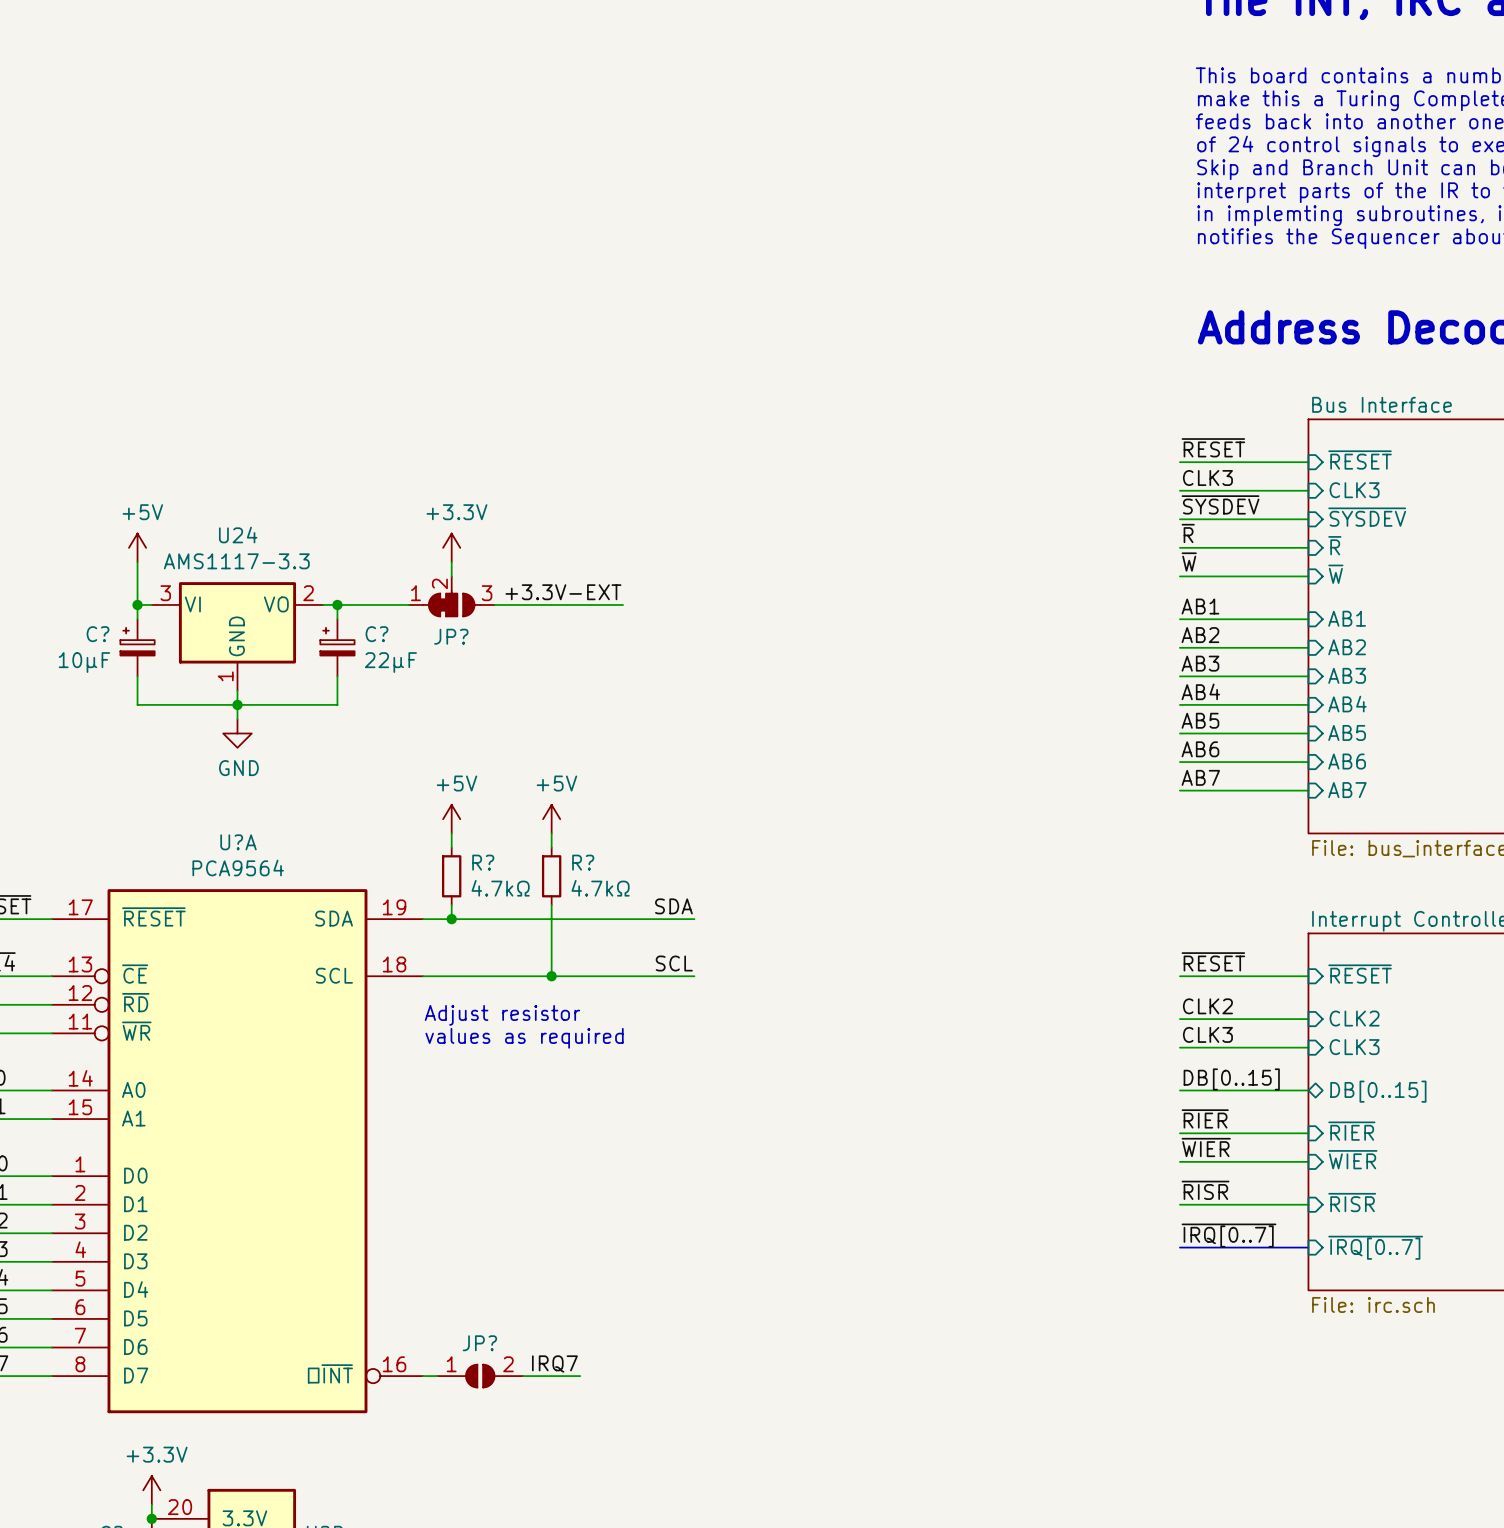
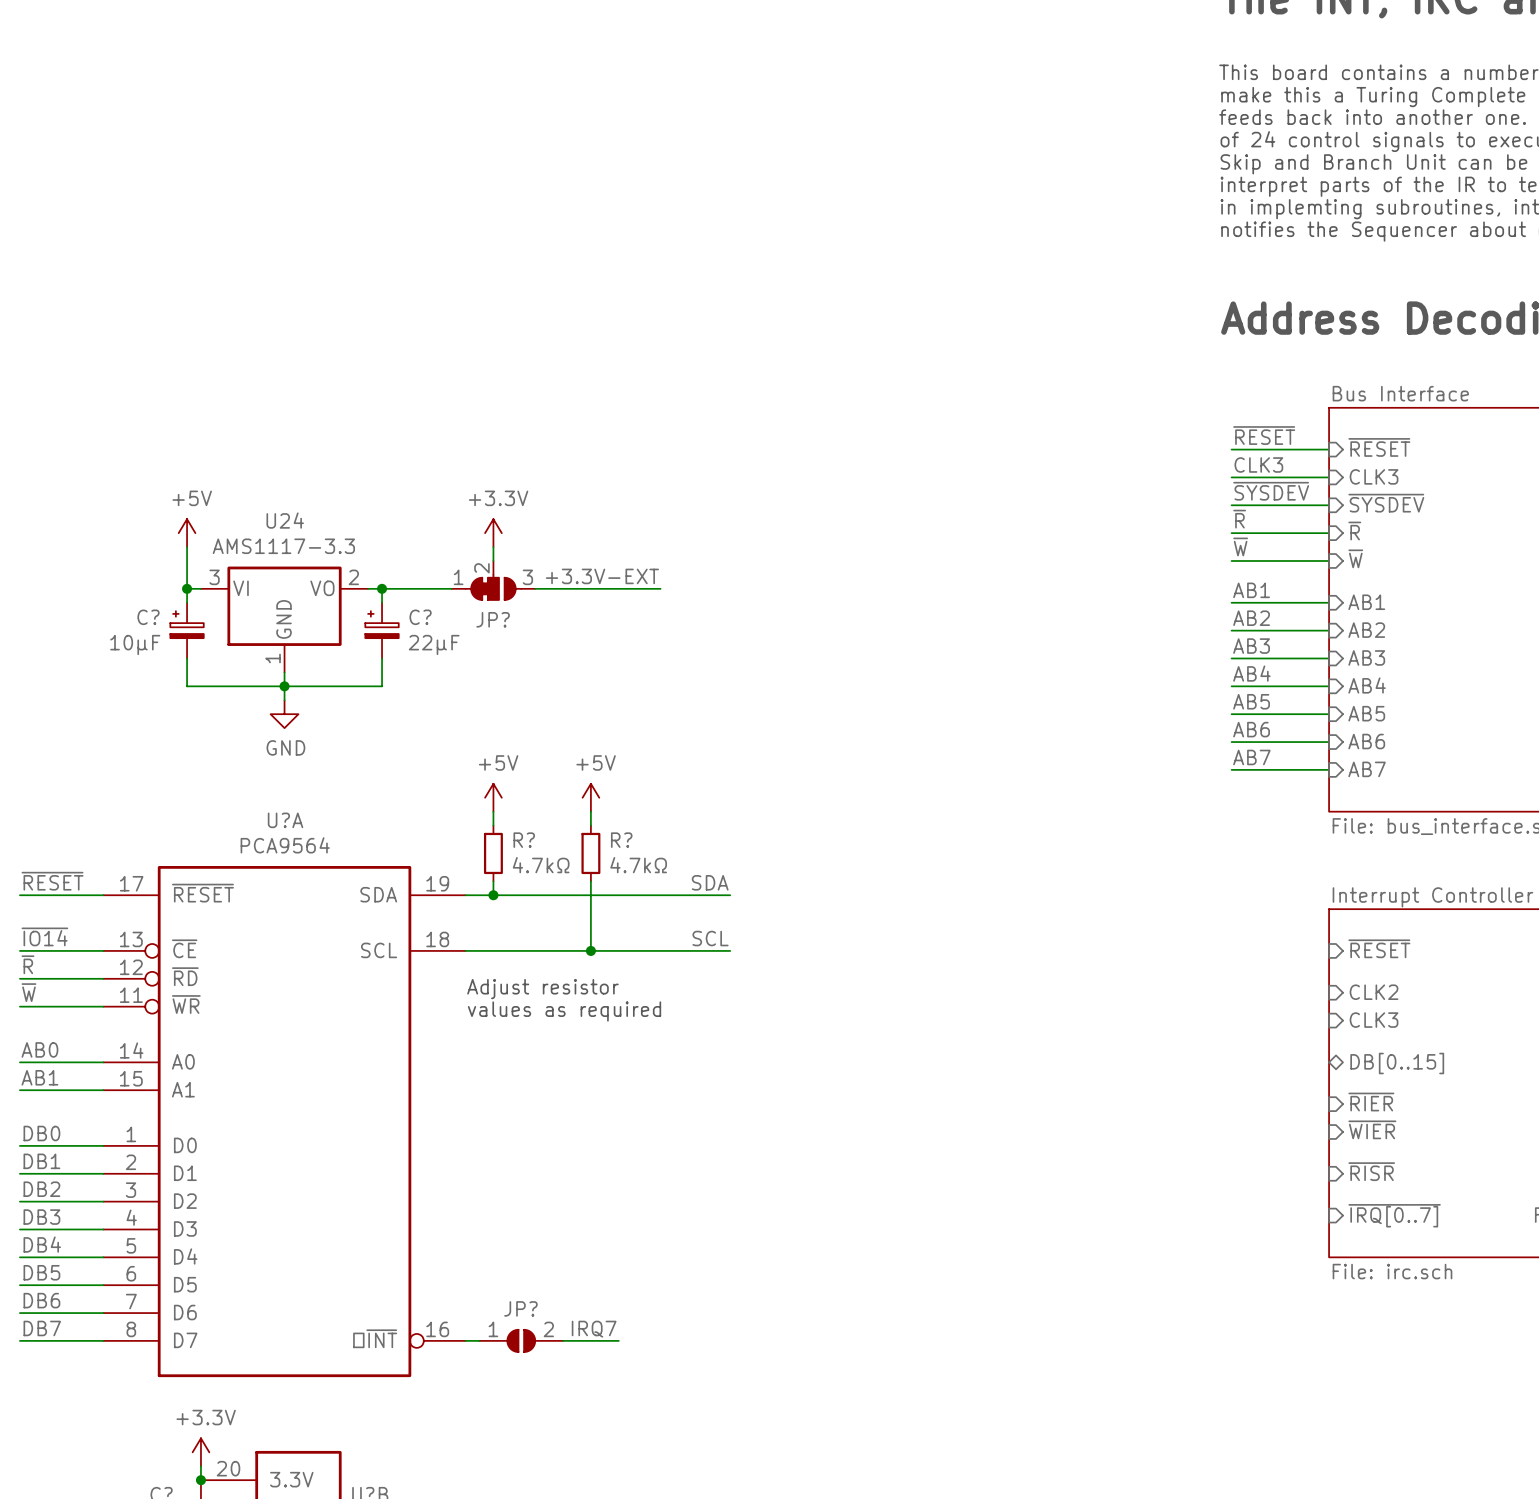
label position: ~{RESET} (1213, 447) -> ~{RESET} (1264, 435)
wire: (1179, 462) (1208, 462) -> none
label position: CLK3 (1207, 478) -> CLK3 (1258, 465)
wire: (1179, 490) (1208, 490) -> none
label position: ~{SYSDEV} (1220, 504) -> ~{SYSDEV} (1271, 491)
wire: (1179, 519) (1208, 519) -> none
label position: ~{R} (1188, 533) -> ~{R} (1239, 519)
wire: (1179, 547) (1208, 547) -> none
label position: ~{W} (1189, 562) -> ~{W} (1240, 546)
wire: (1179, 576) (1208, 576) -> none
label position: AB1 (1200, 606) -> AB1 (1251, 590)
wire: (1179, 619) (1208, 619) -> none
label position: AB2 (1200, 635) -> AB2 (1251, 618)
wire: (1179, 647) (1208, 647) -> none
label position: AB3 (1200, 663) -> AB3 (1251, 646)
wire: (1179, 676) (1208, 676) -> none
label position: AB4 (1200, 691) -> AB4 (1251, 673)
wire: (1179, 704) (1208, 704) -> none
label position: AB5 (1200, 720) -> AB5 (1251, 701)
wire: (1179, 733) (1208, 733) -> none
label position: AB6 (1200, 749) -> AB6 (1251, 729)
wire: (1179, 762) (1208, 762) -> none
label position: AB7 (1200, 777) -> AB7 (1251, 757)
wire: (1179, 790) (1208, 790) -> none
label: ~{RESET} (1213, 961) -> none
wire: (1179, 976) (1308, 976) -> none
label: CLK2 (1207, 1006) -> none
wire: (1179, 1019) (1308, 1019) -> none
label: CLK3 (1207, 1034) -> none
wire: (1179, 1047) (1308, 1047) -> none
label: DB[0..15] (1231, 1079) -> none
wire: (1179, 1090) (1308, 1090) -> none
label: ~{RIER} (1205, 1118) -> none
wire: (1179, 1133) (1308, 1133) -> none
label: ~{WIER} (1206, 1147) -> none
wire: (1179, 1161) (1308, 1161) -> none
label: ~{RISR} (1205, 1190) -> none
wire: (1179, 1204) (1308, 1204) -> none
label: ~{IRQ[0..7]} (1229, 1235) -> none
bus: (1179, 1247) (1308, 1247) -> none

